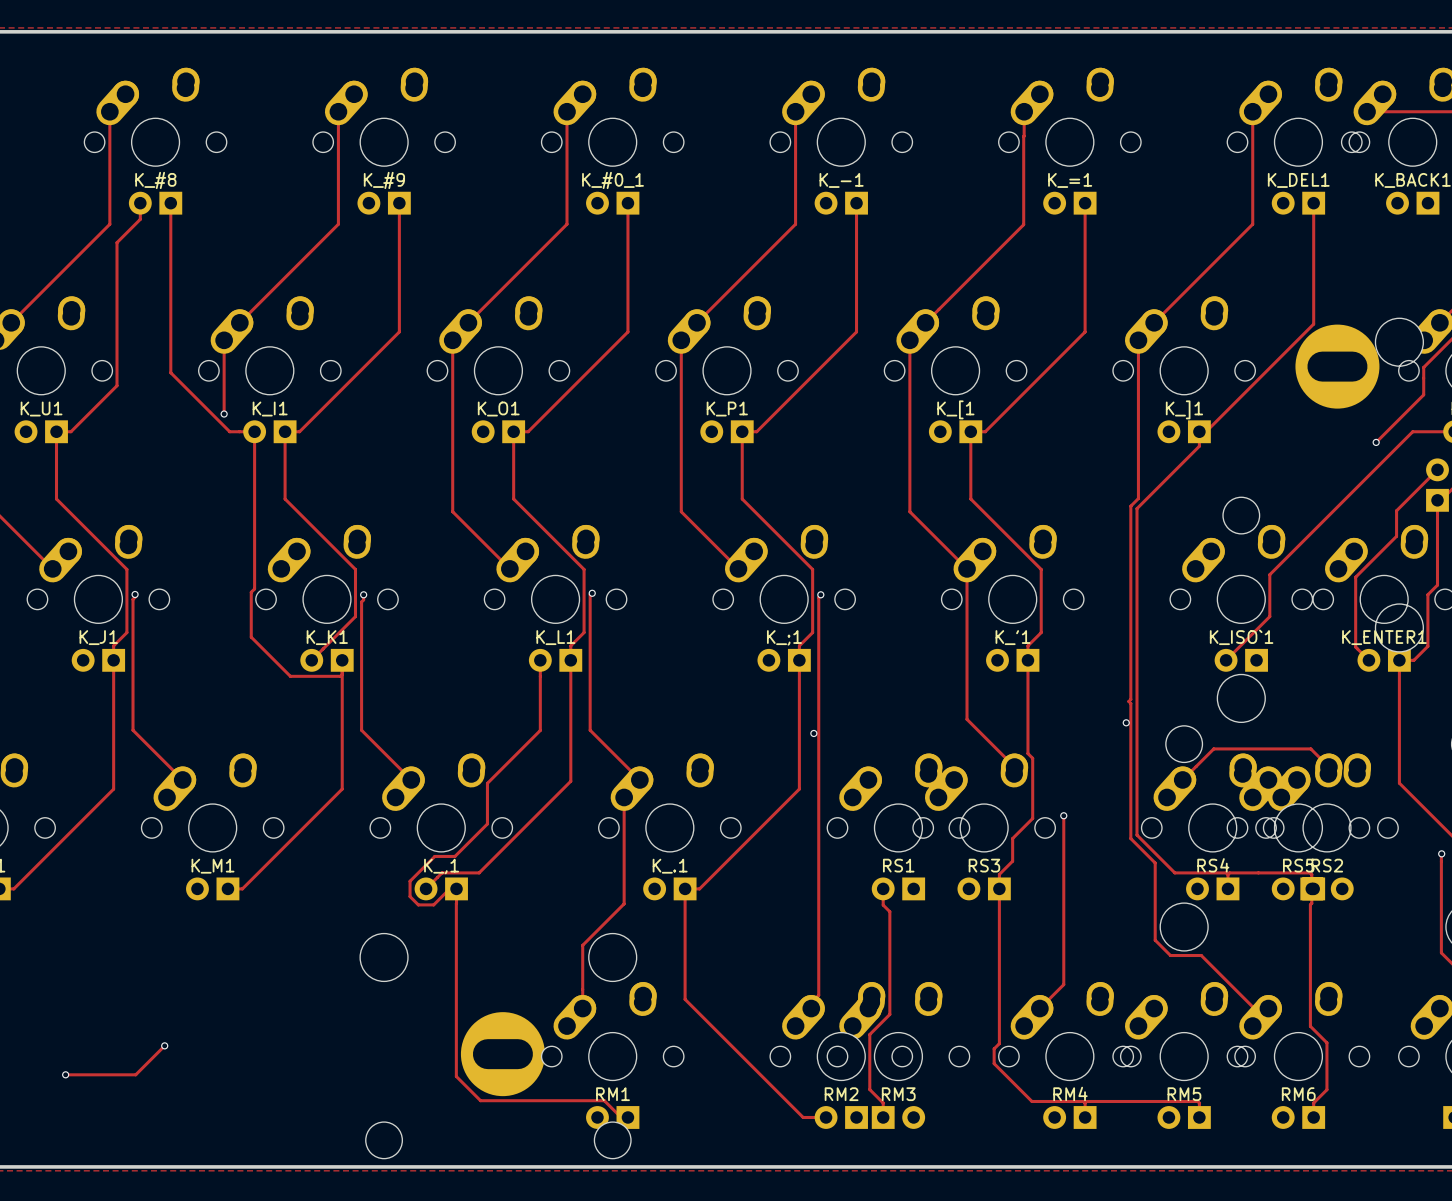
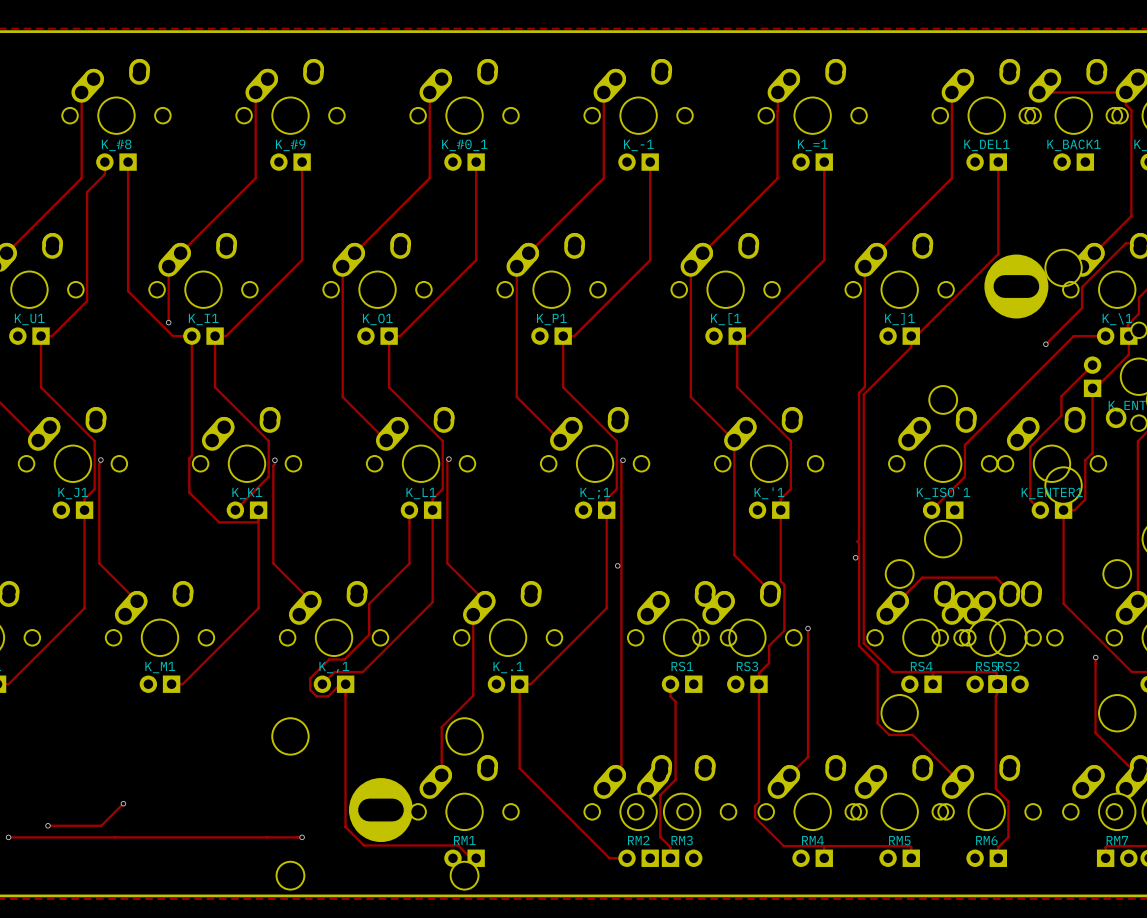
track: none -> (8, 837) (302, 837)
via: none -> (8, 837)
via: none -> (302, 837)

